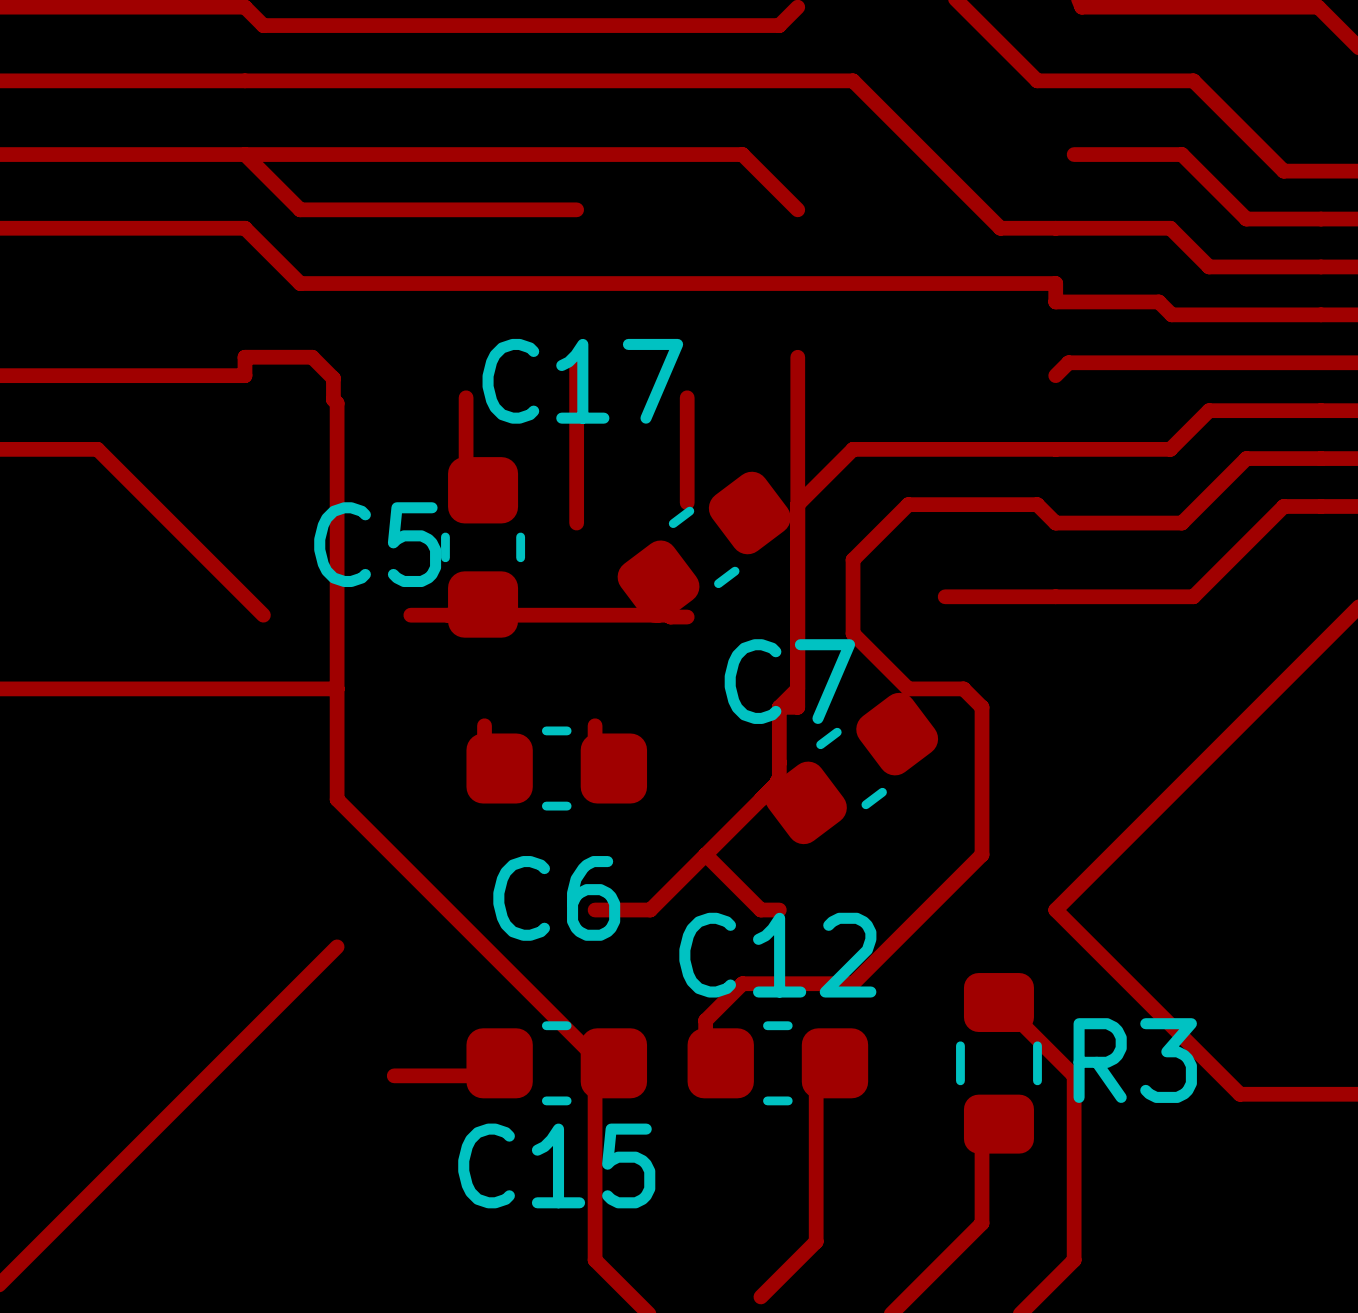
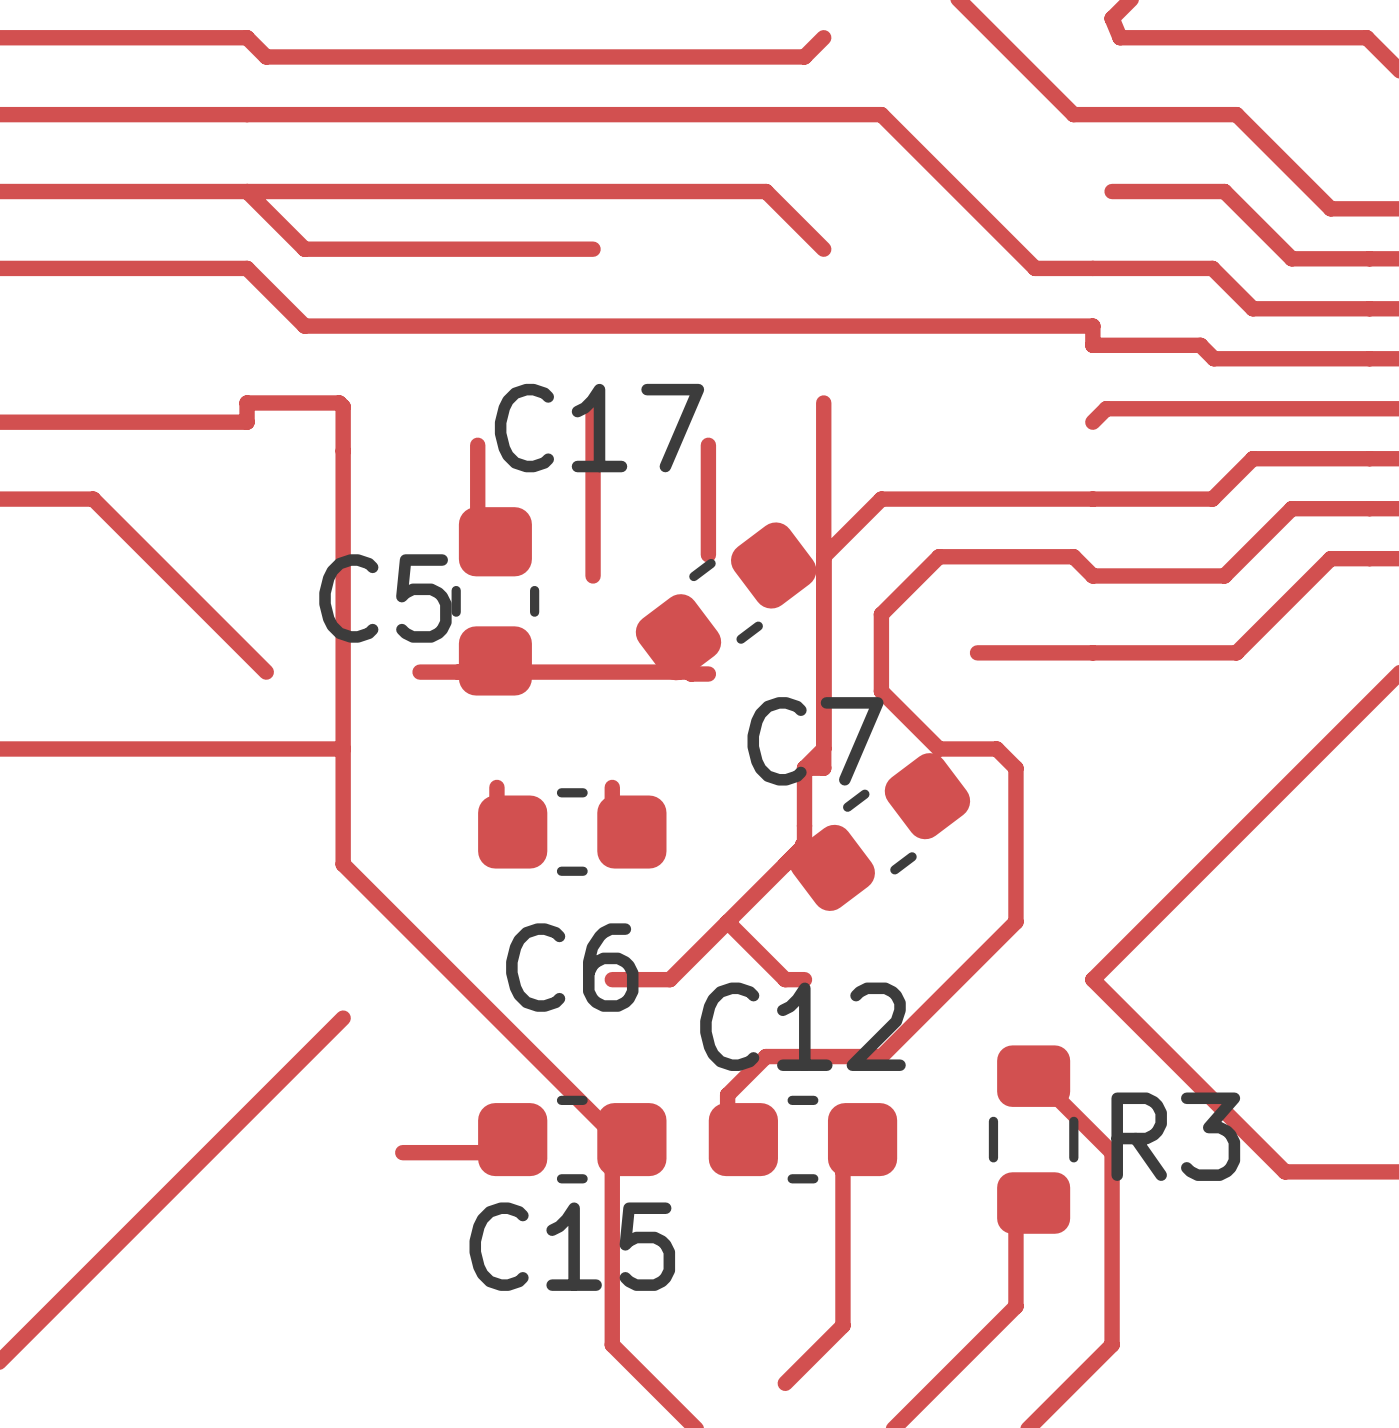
track: (312, 357) (333, 378) (333, 399) (337, 403) -> (317, 402) (339, 402) (343, 406) (343, 451)

